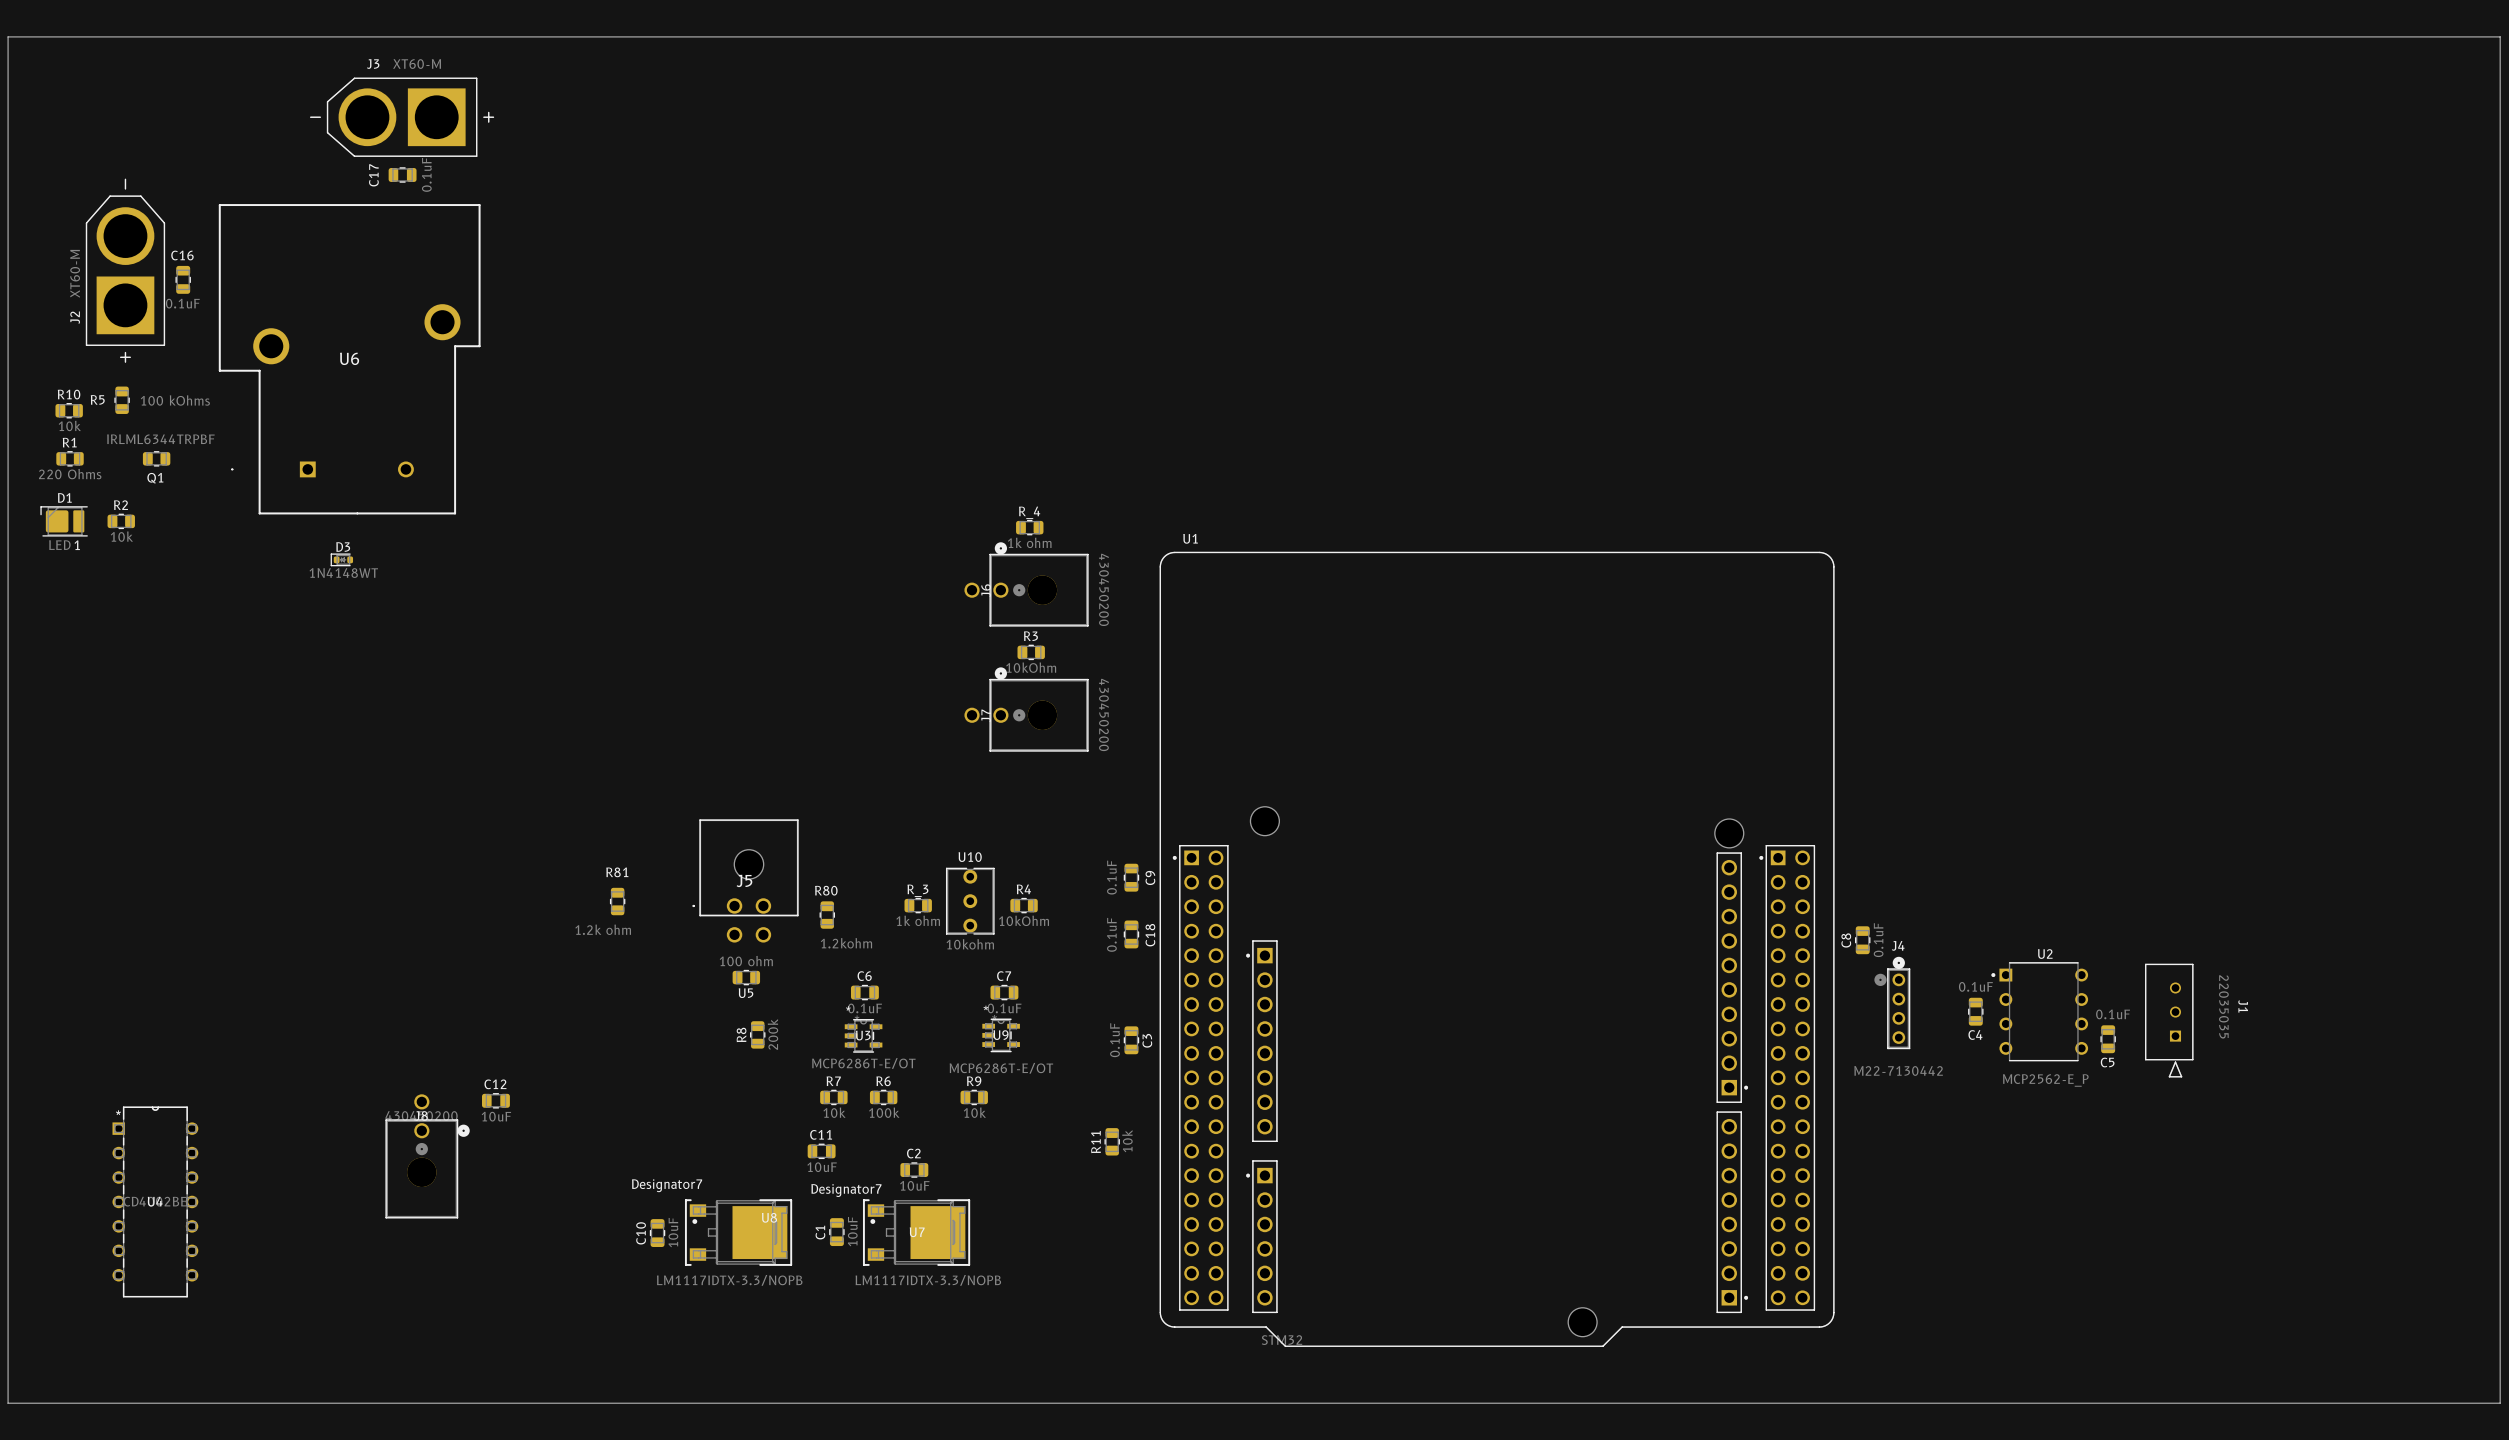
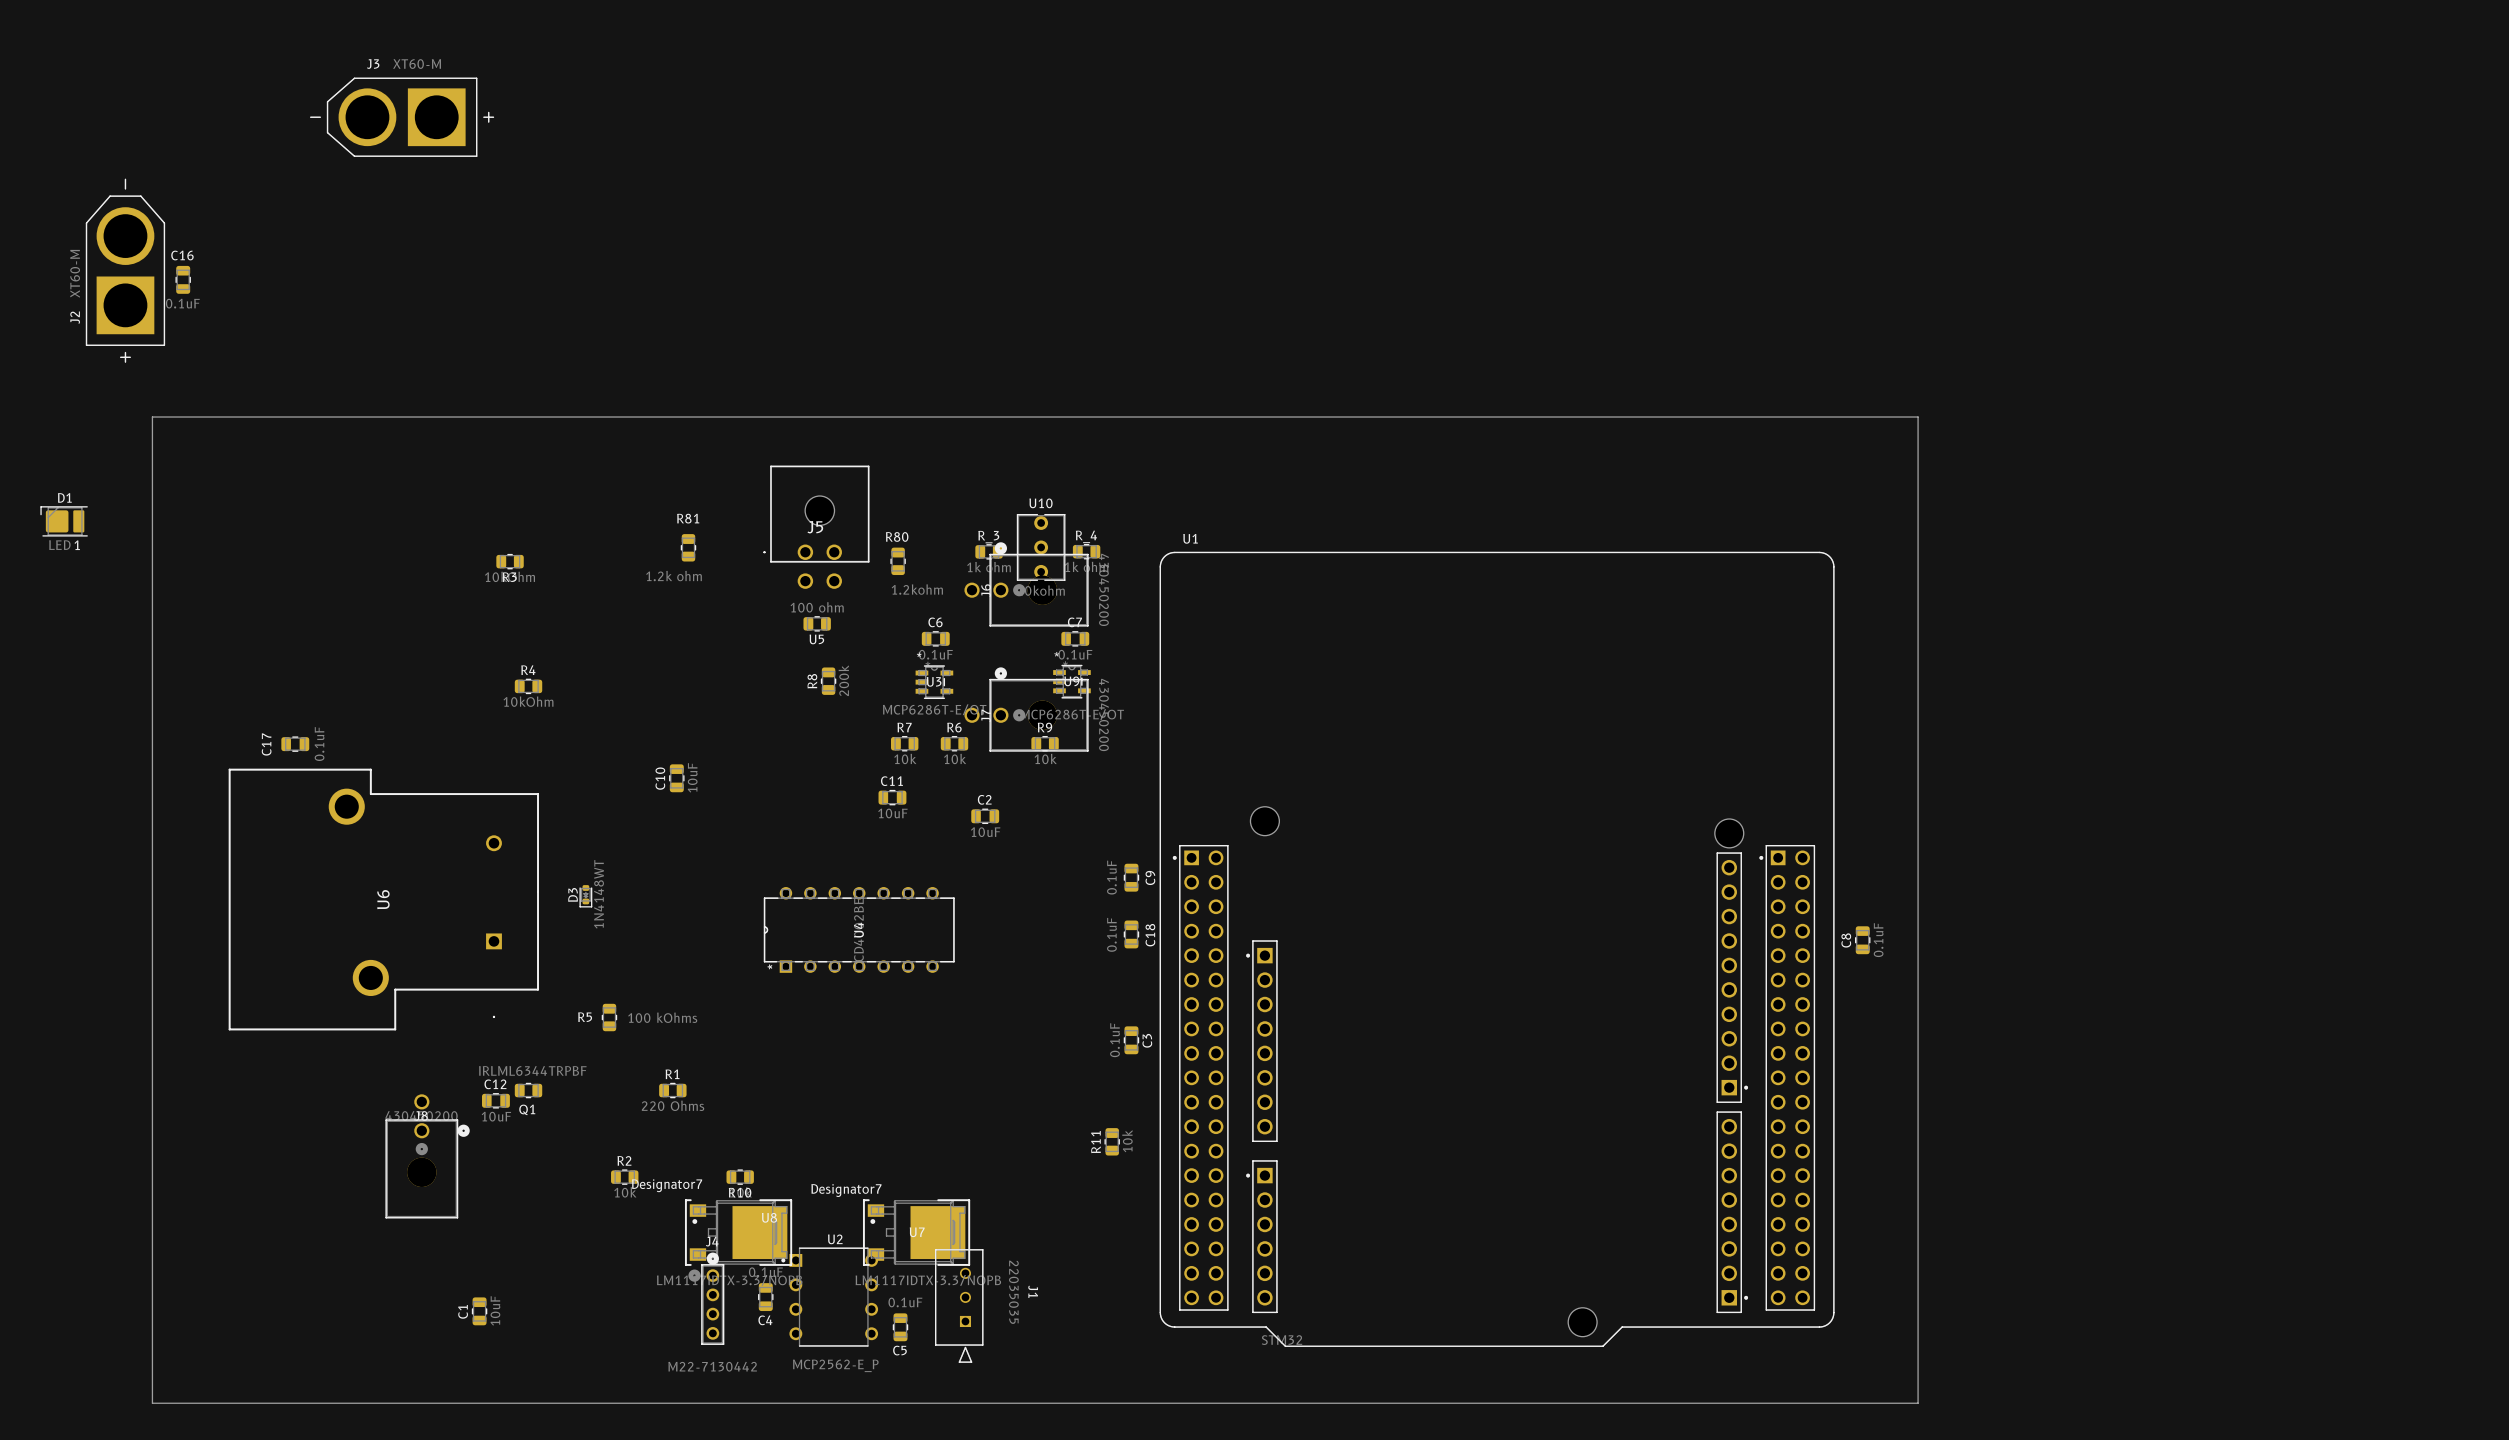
C17 position: (402, 174) -> (295, 744)
U6 rotation: 0° (349, 359) -> 90° counterclockwise (383, 899)
U6 position: (349, 359) -> (383, 899)
R10 name position: R10 (69, 394) -> R10 (740, 1192)
R5 position: (122, 400) -> (609, 1017)
R10 position: (69, 410) -> (740, 1177)
R1 position: (70, 458) -> (672, 1090)
Q1 position: (156, 458) -> (528, 1090)
R2 position: (121, 521) -> (624, 1177)
R_4 position: (1029, 527) -> (1086, 551)
D3 rotation: 0° (341, 559) -> 90° counterclockwise (585, 896)
D3 position: (341, 559) -> (585, 896)
R3 name position: R3 (1030, 636) -> R3 (509, 577)
R3 position: (1031, 652) -> (510, 561)
J5 position: (745, 880) -> (816, 527)
R81 position: (617, 901) -> (688, 547)
U10 position: (970, 901) -> (1041, 547)
R_3 position: (918, 905) -> (989, 551)
R4 position: (1024, 905) -> (528, 686)
R80 position: (827, 915) -> (898, 561)
U5 position: (746, 977) -> (817, 623)
C6 position: (864, 992) -> (935, 638)
C7 position: (1004, 992) -> (1075, 638)
J4 position: (1892, 1003) -> (706, 1298)
C4 position: (1975, 1011) -> (765, 1297)
U2 position: (2039, 1011) -> (829, 1297)
J1 position: (2169, 1020) -> (959, 1305)
R8 position: (757, 1034) -> (828, 681)
U3 position: (863, 1035) -> (934, 682)
U9 position: (1001, 1035) -> (1071, 681)
C5 position: (2108, 1039) -> (900, 1327)
R7 position: (833, 1097) -> (904, 743)
R6 position: (883, 1097) -> (954, 743)
R9 position: (974, 1097) -> (1045, 743)
R6 value: 100k (884, 1112) -> 10k (955, 758)
C11 position: (821, 1151) -> (892, 797)
C2 position: (914, 1170) -> (985, 816)
U4 rotation: 0° (155, 1201) -> 90° counterclockwise (859, 929)
U4 position: (155, 1201) -> (859, 929)
C1 position: (836, 1232) -> (479, 1311)
C10 position: (657, 1233) -> (676, 778)
board edge: (152, 1403) (8, 1403) (8, 36) (2500, 36) (2500, 1403) (1918, 1403) -> (152, 1403) (152, 417) (1918, 417) (1918, 1403)

